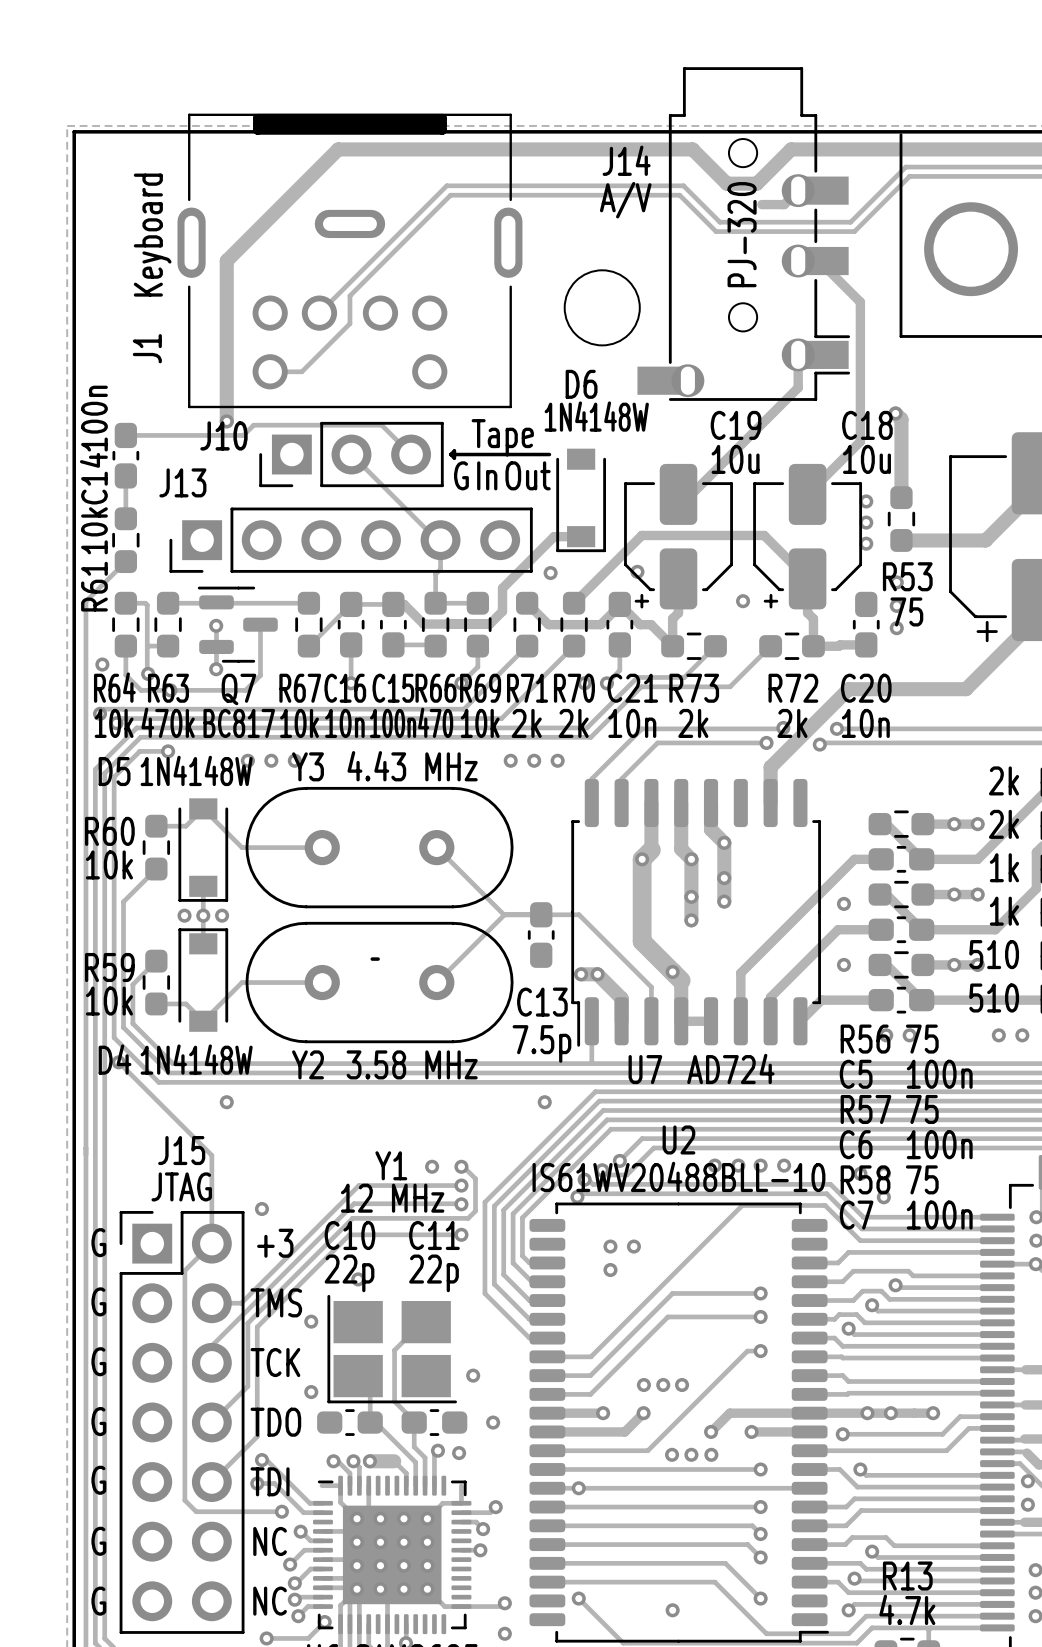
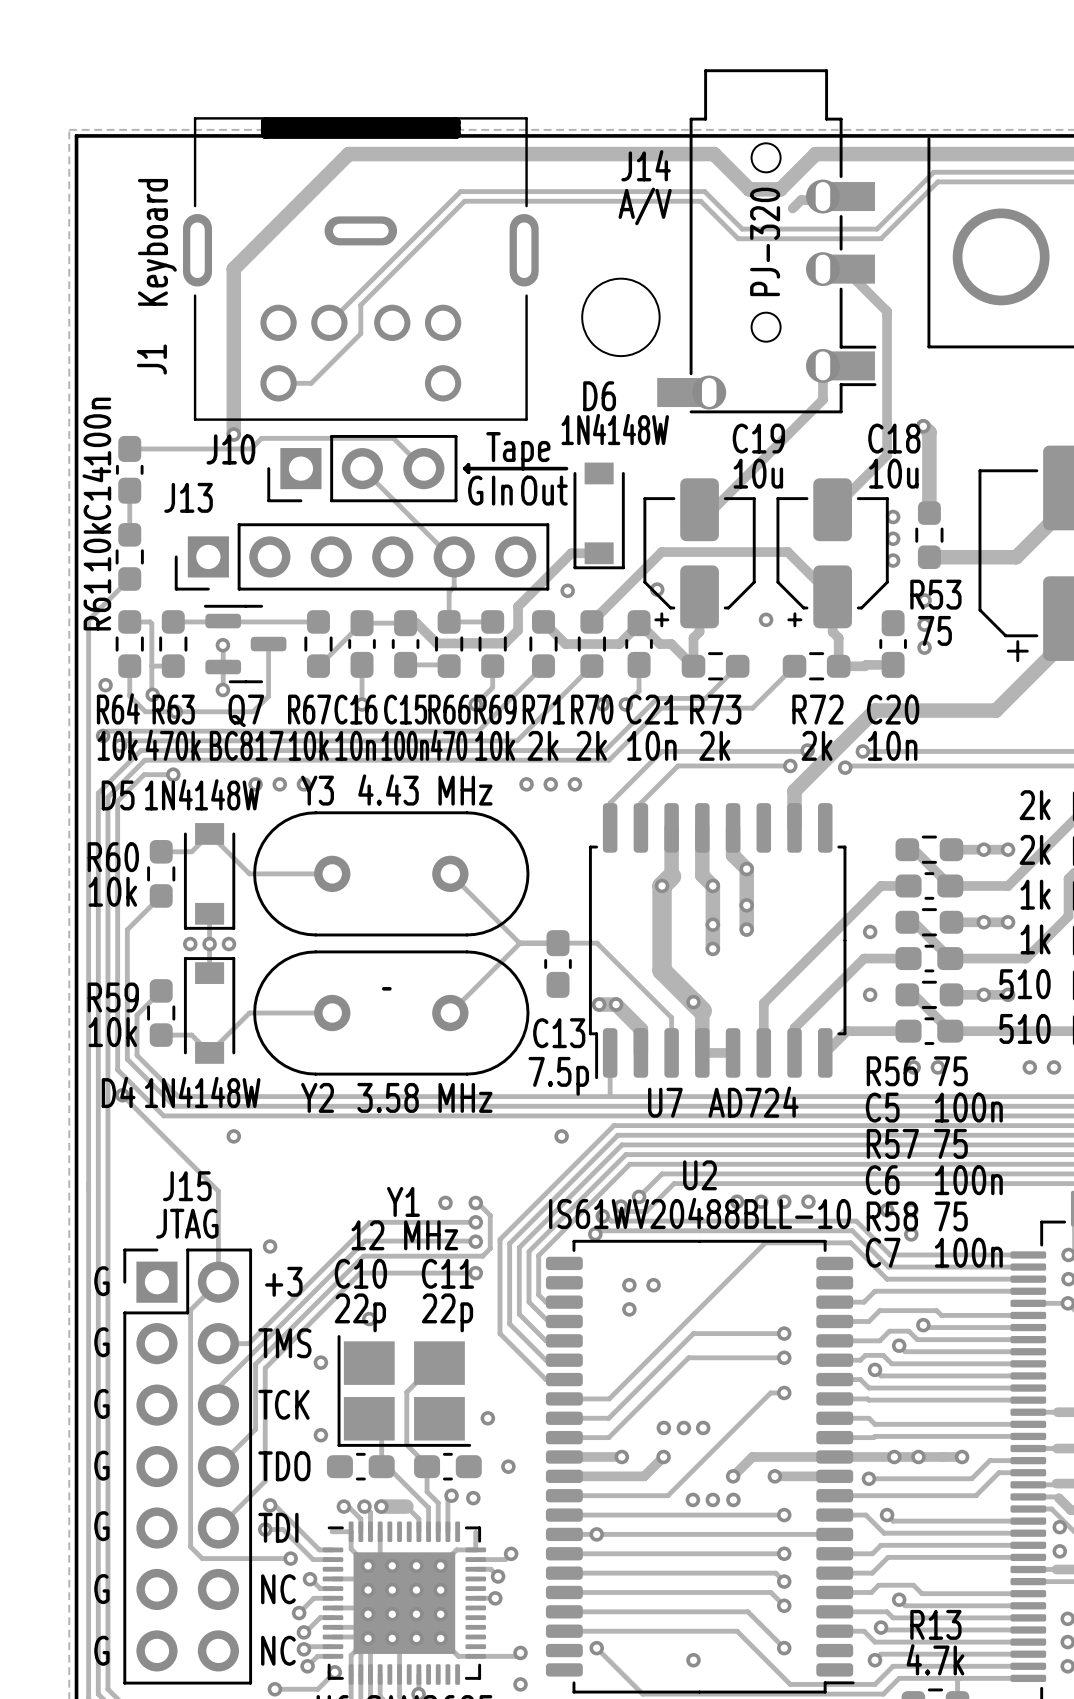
track: (798, 190) (784, 204) (761, 204) -> none
track: none -> (822, 200) (801, 200) (792, 208)

